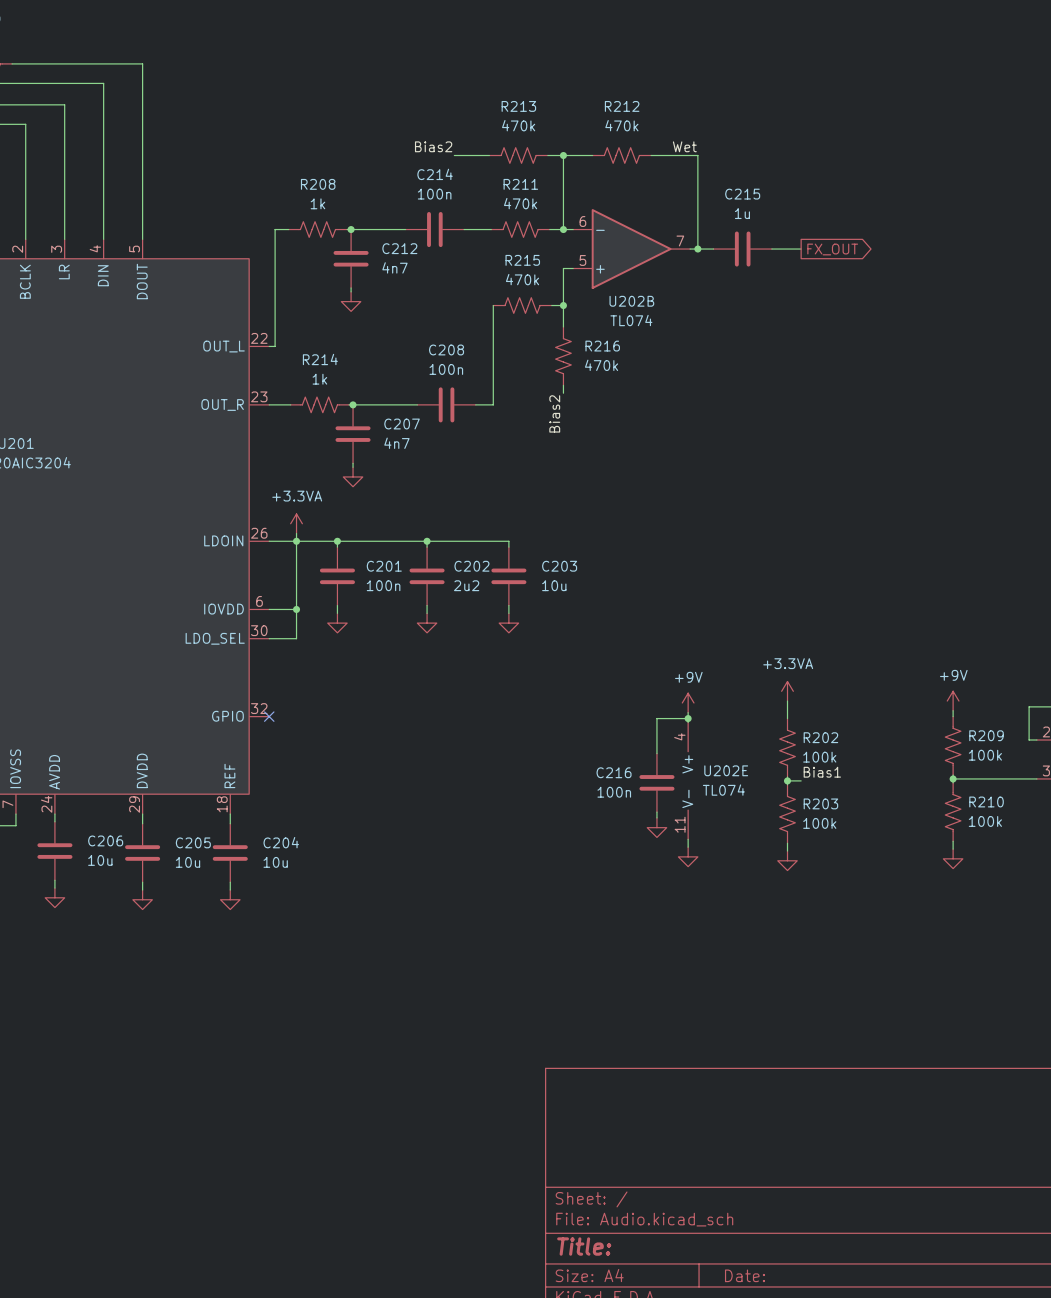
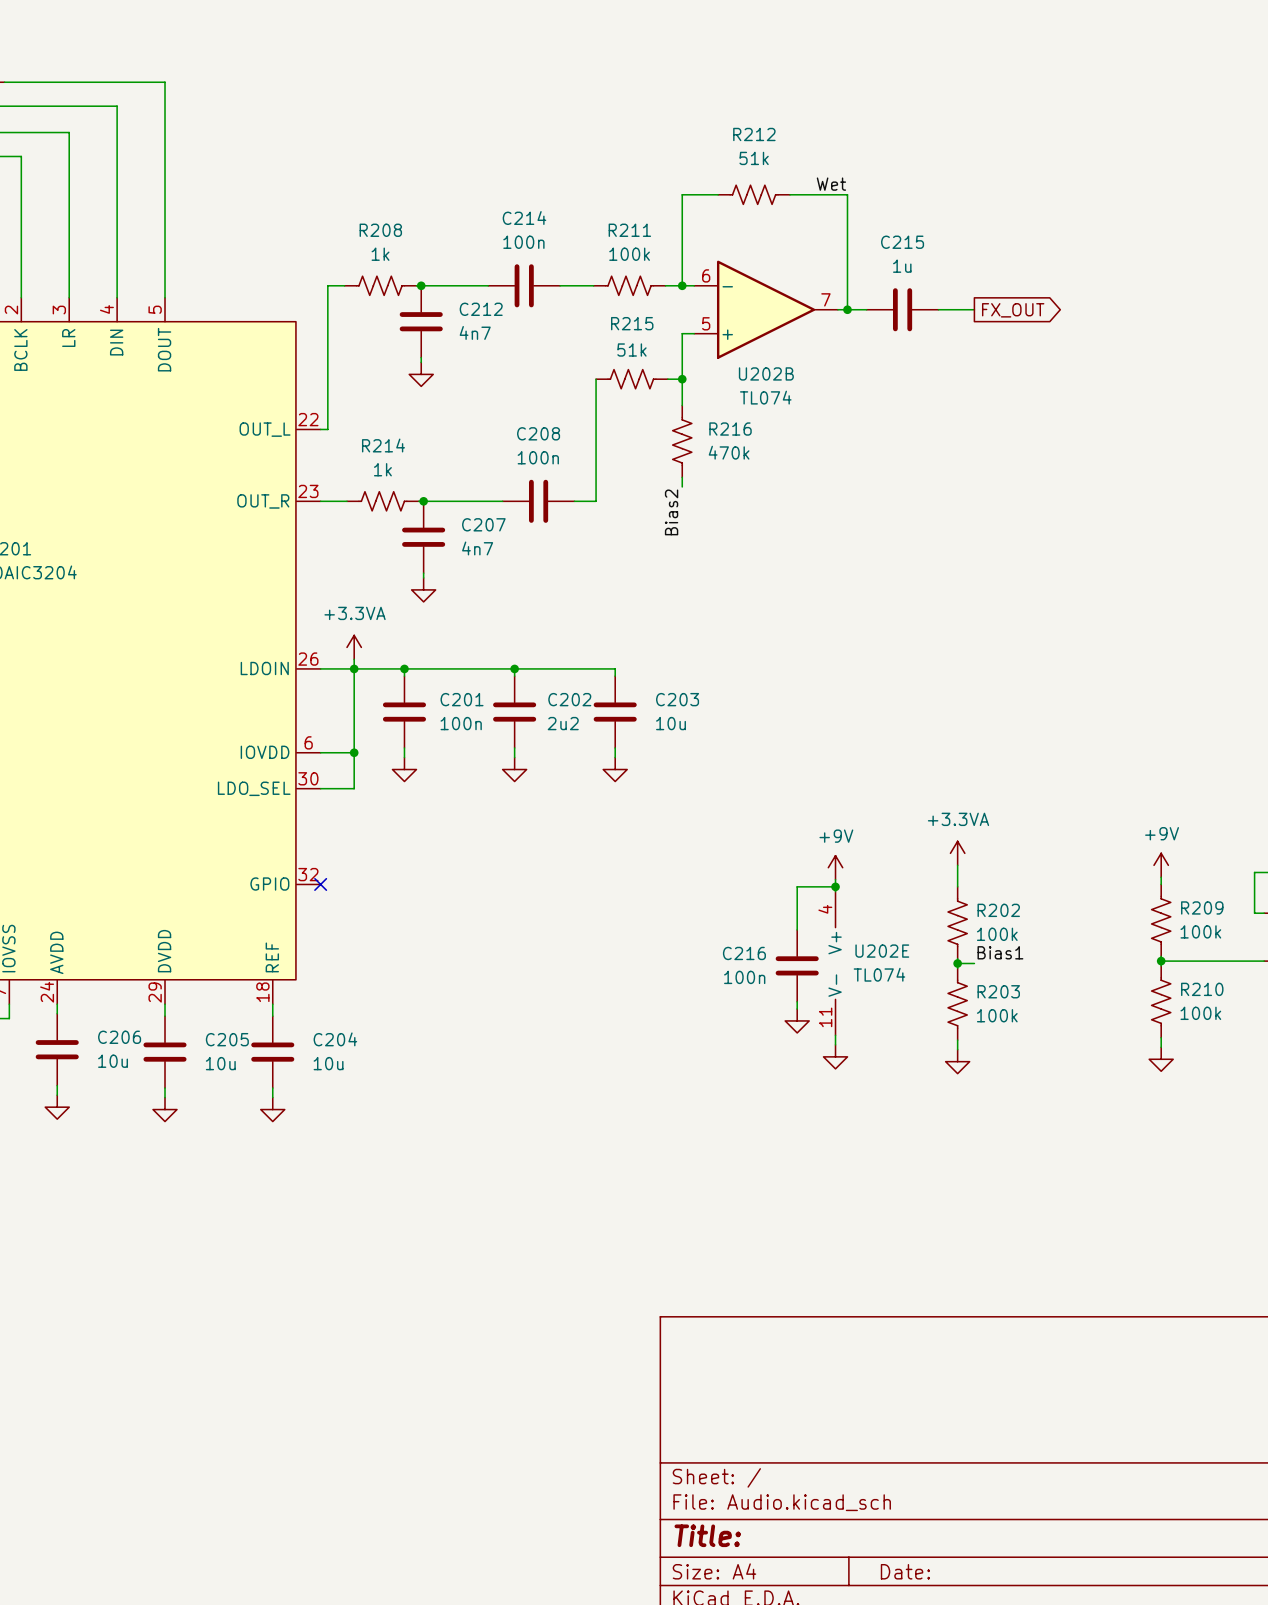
R212 value: 470k (621, 125) -> 51k (754, 158)
label: Bias2 (433, 146) -> none
wire: (454, 155) (489, 155) -> none
R213: 470k (518, 155) -> none
wire: (547, 155) (563, 155) -> none
junction: (563, 155) -> none
R211 value: 470k (520, 203) -> 100k (629, 254)
R215 value: 470k (522, 279) -> 51k (631, 350)

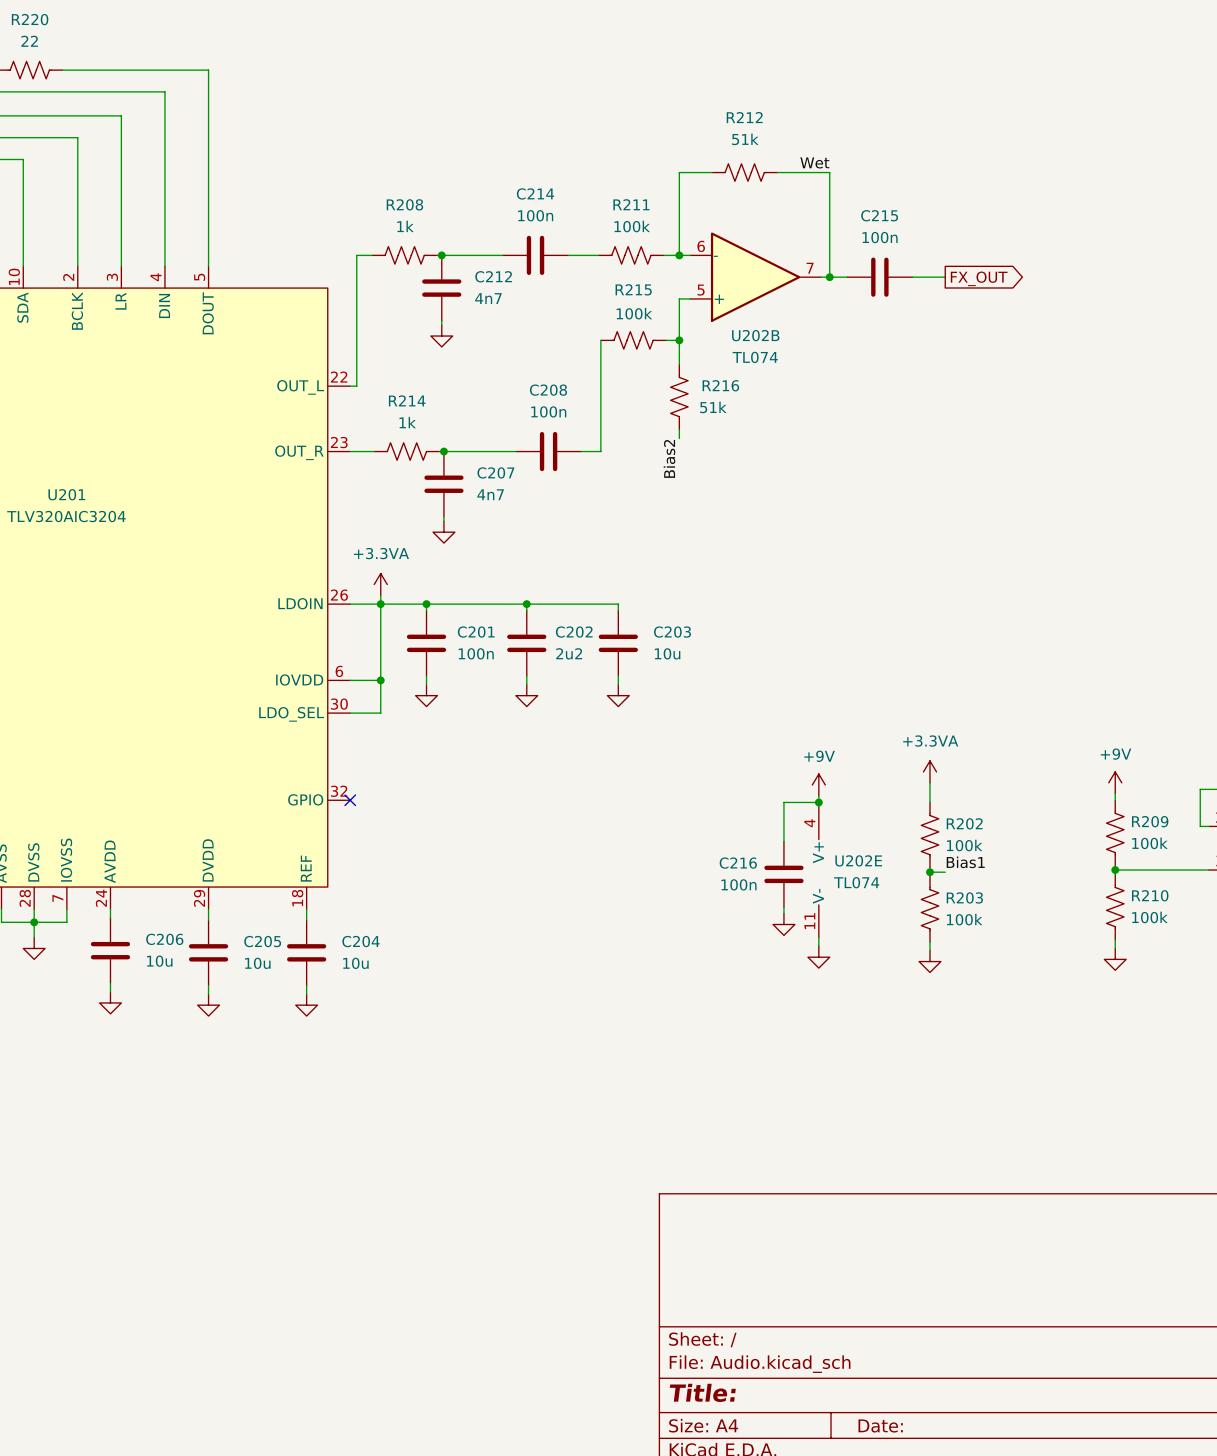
C215 value: 1u (902, 266) -> 100n (880, 237)
R215 value: 51k (631, 350) -> 100k (634, 313)
R216 value: 470k (729, 452) -> 51k (713, 407)

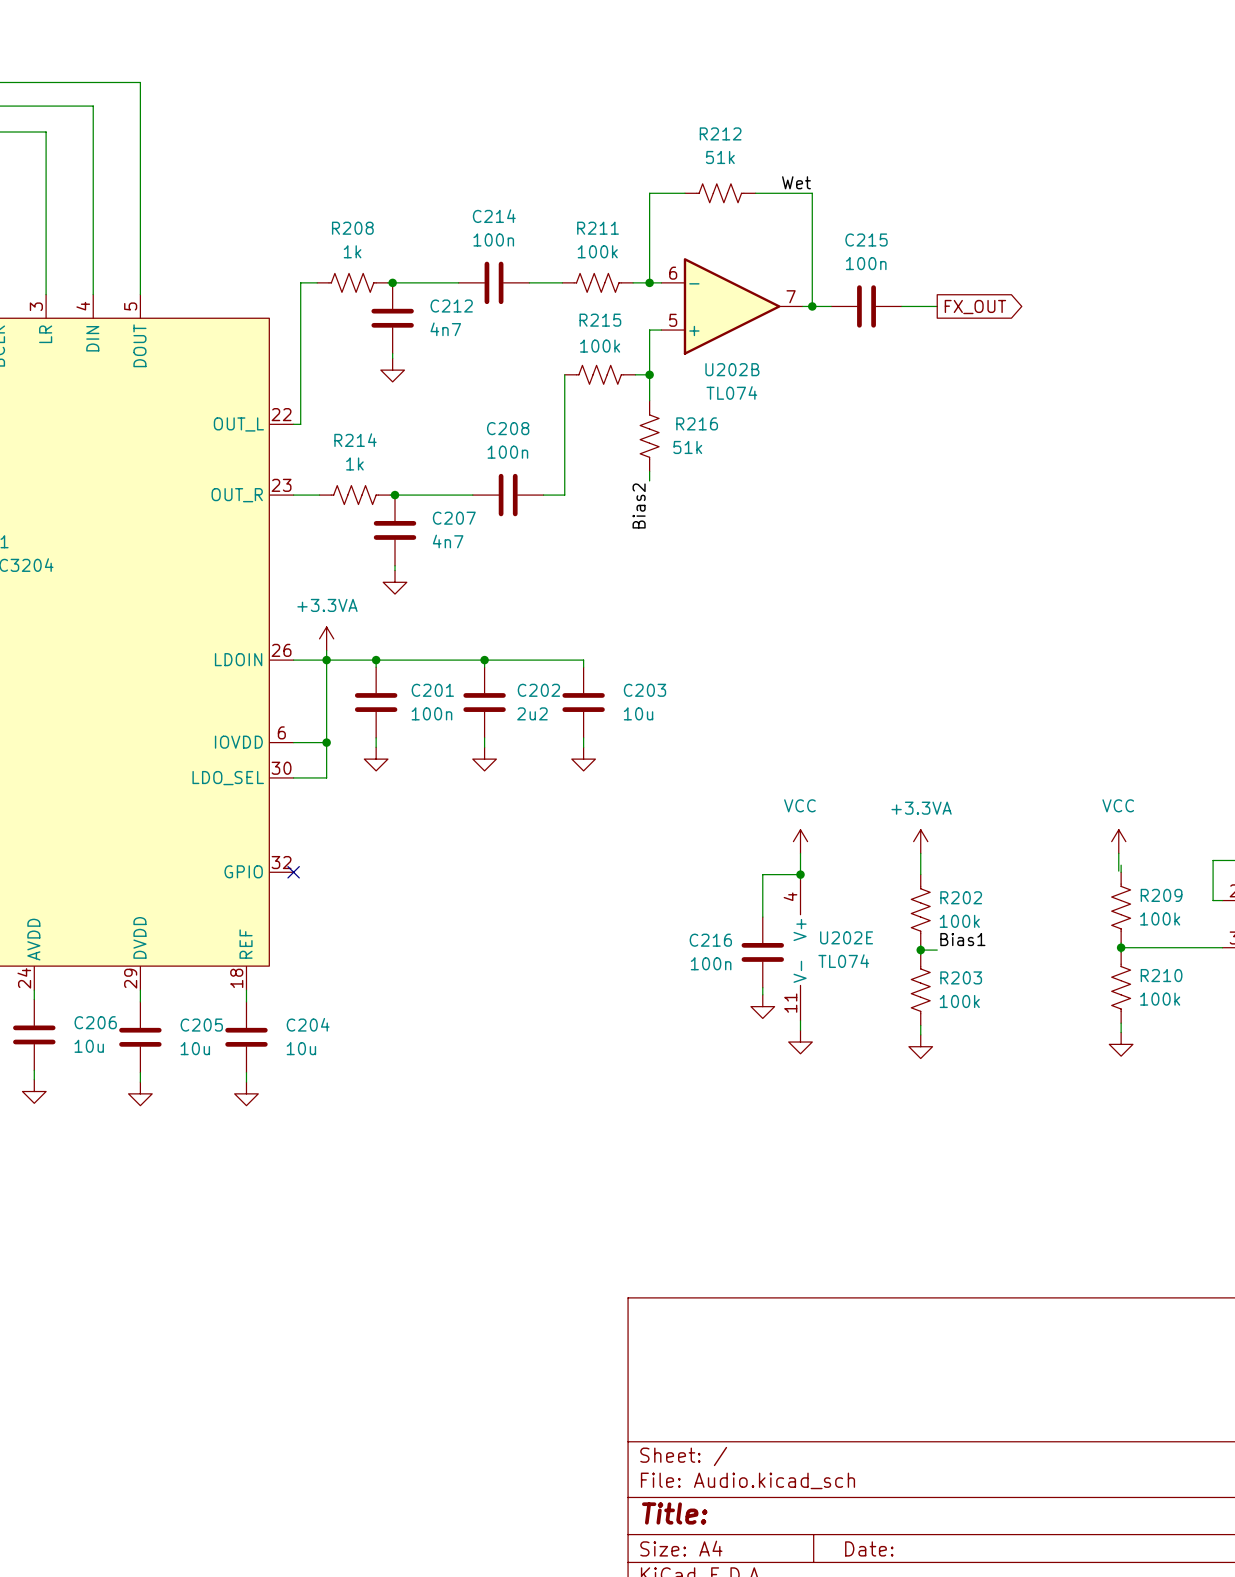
power symbol: none -> VCC (800, 841)
power symbol: none -> VCC (1118, 841)
wire: none -> (1118, 853) (1118, 871)
power symbol: +9V (1115, 782) -> none
power symbol: +9V (818, 785) -> none

